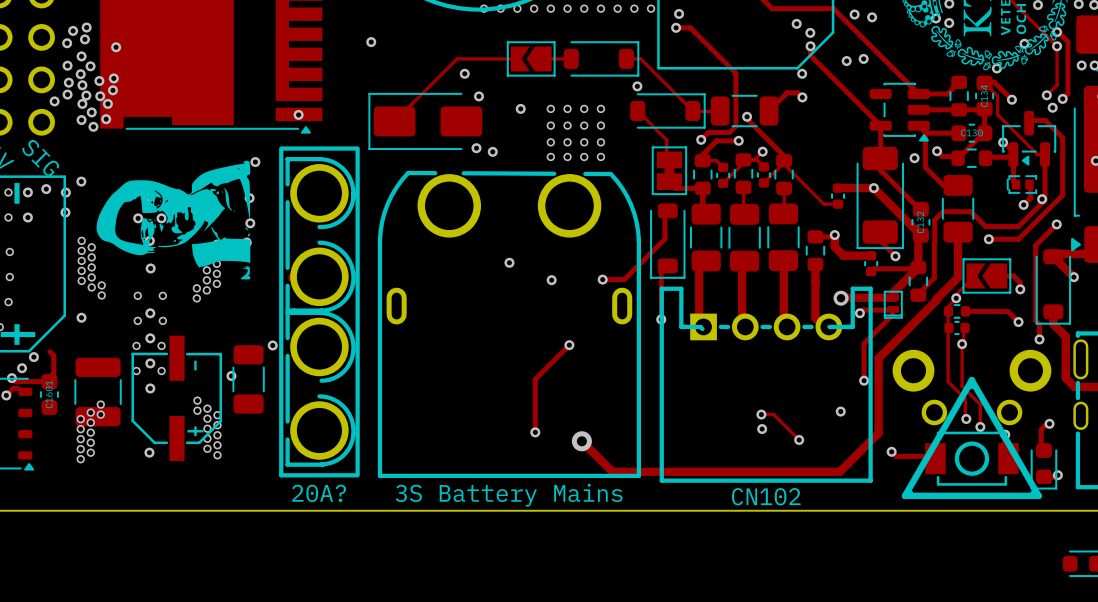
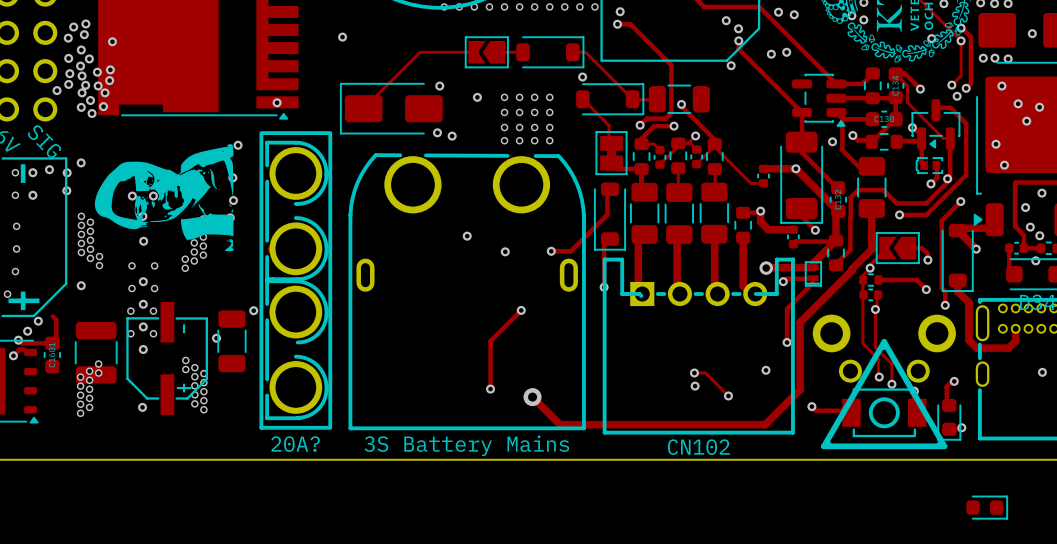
via: (996, 68) -> none
via: (464, 73) -> none
track: (802, 97) (797, 92) (787, 92) (769, 111) -> none
via: (802, 97) -> none

